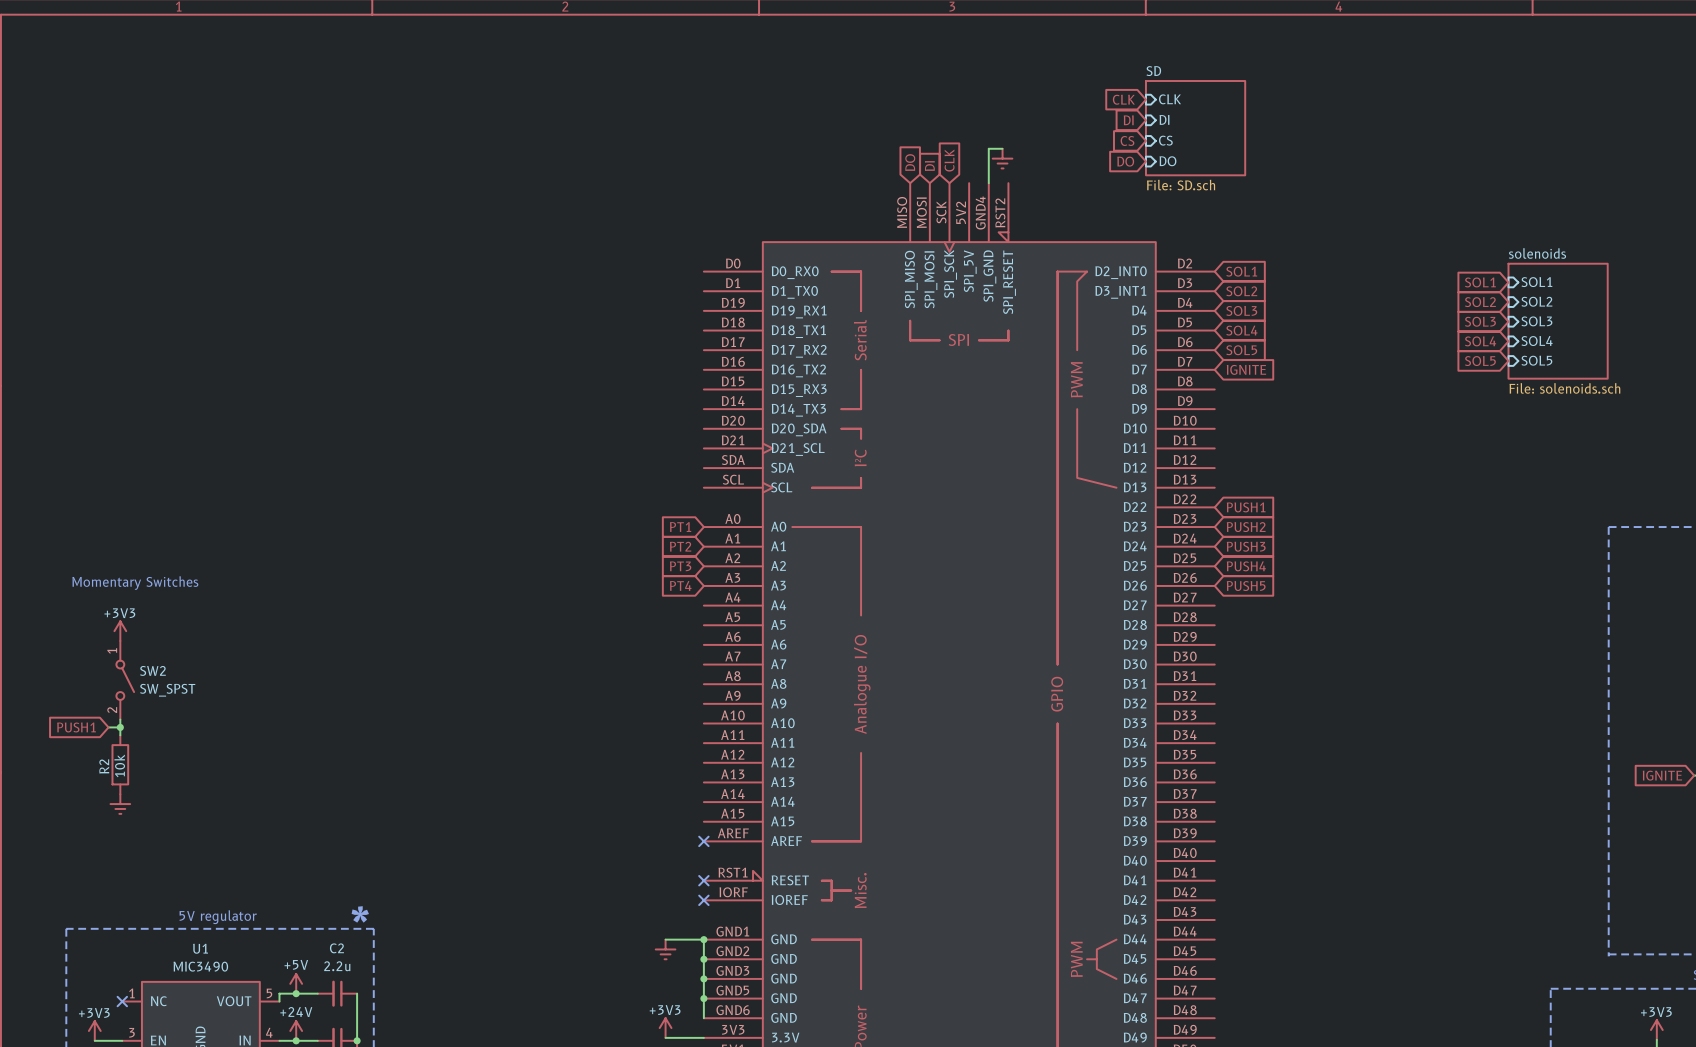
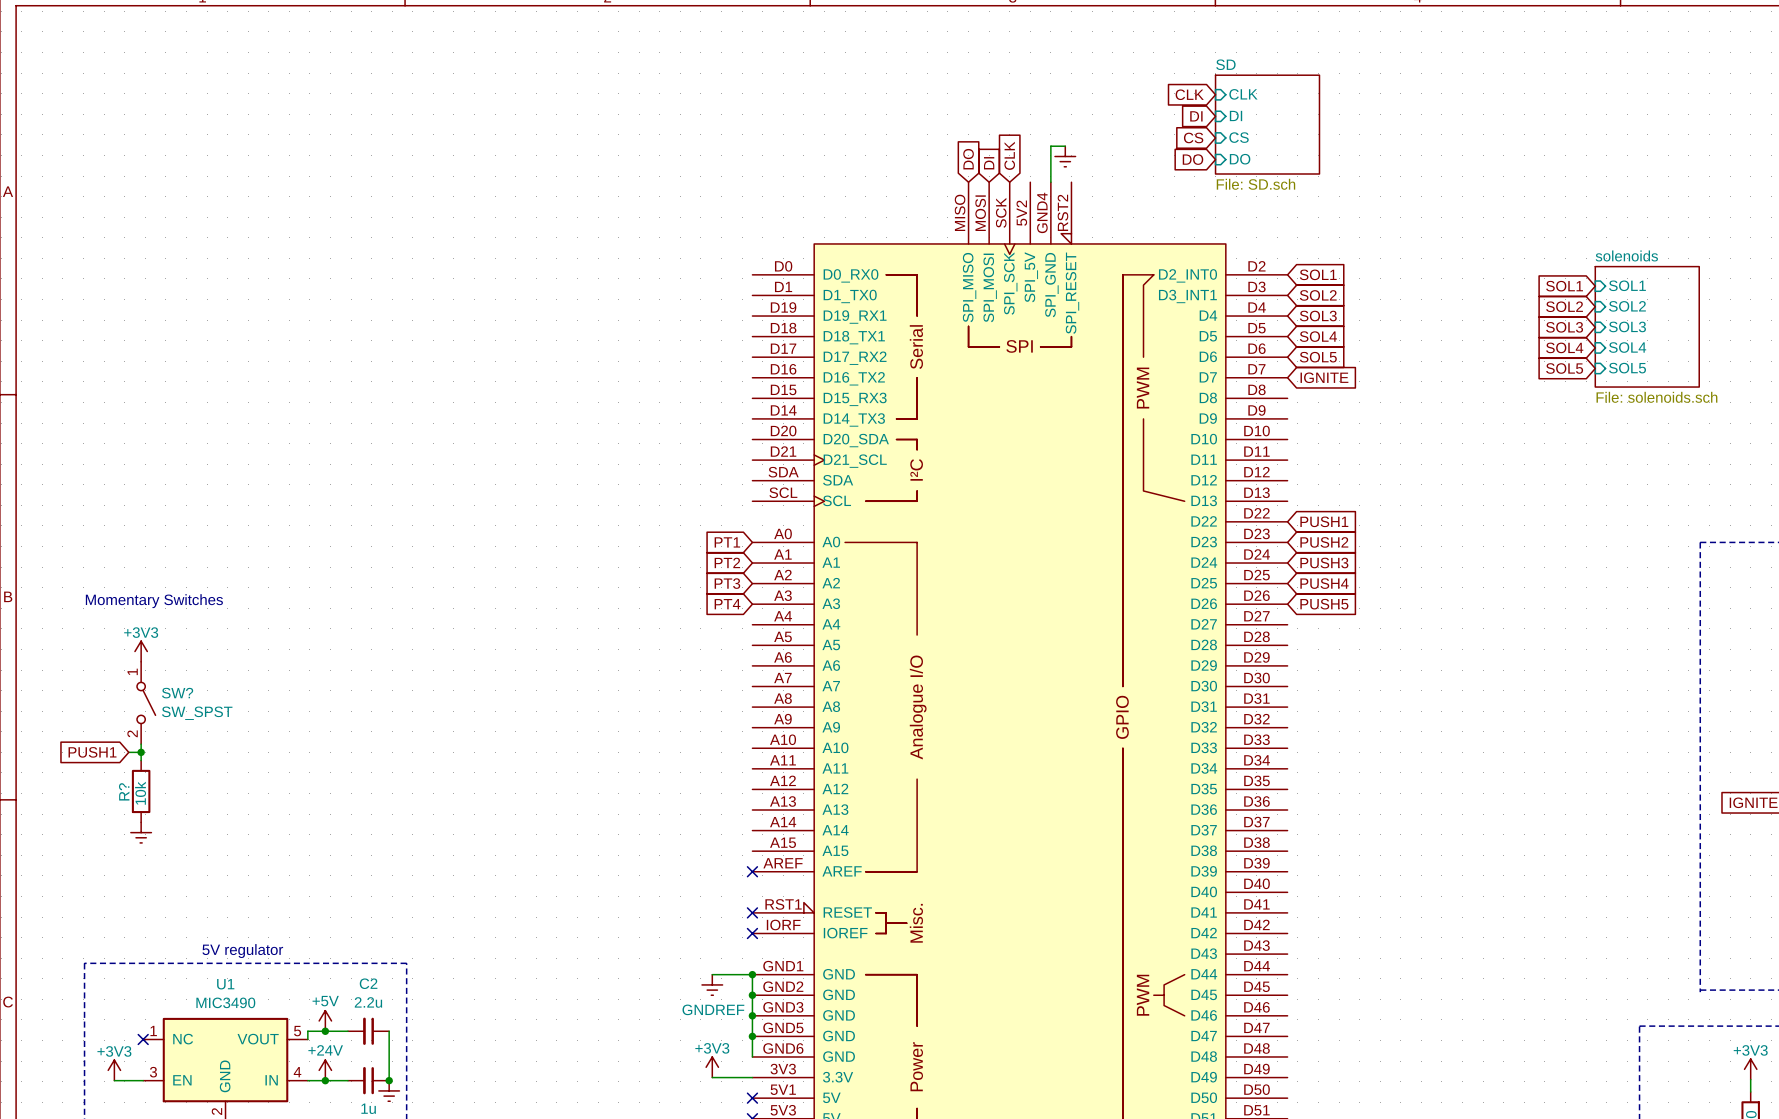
SW2 name: SW2 (152, 670) -> SW? (177, 693)
R2 name: R2 (104, 766) -> R? (124, 791)
text: * (360, 914) -> none
power symbol text: none -> GNDREF (713, 1009)

